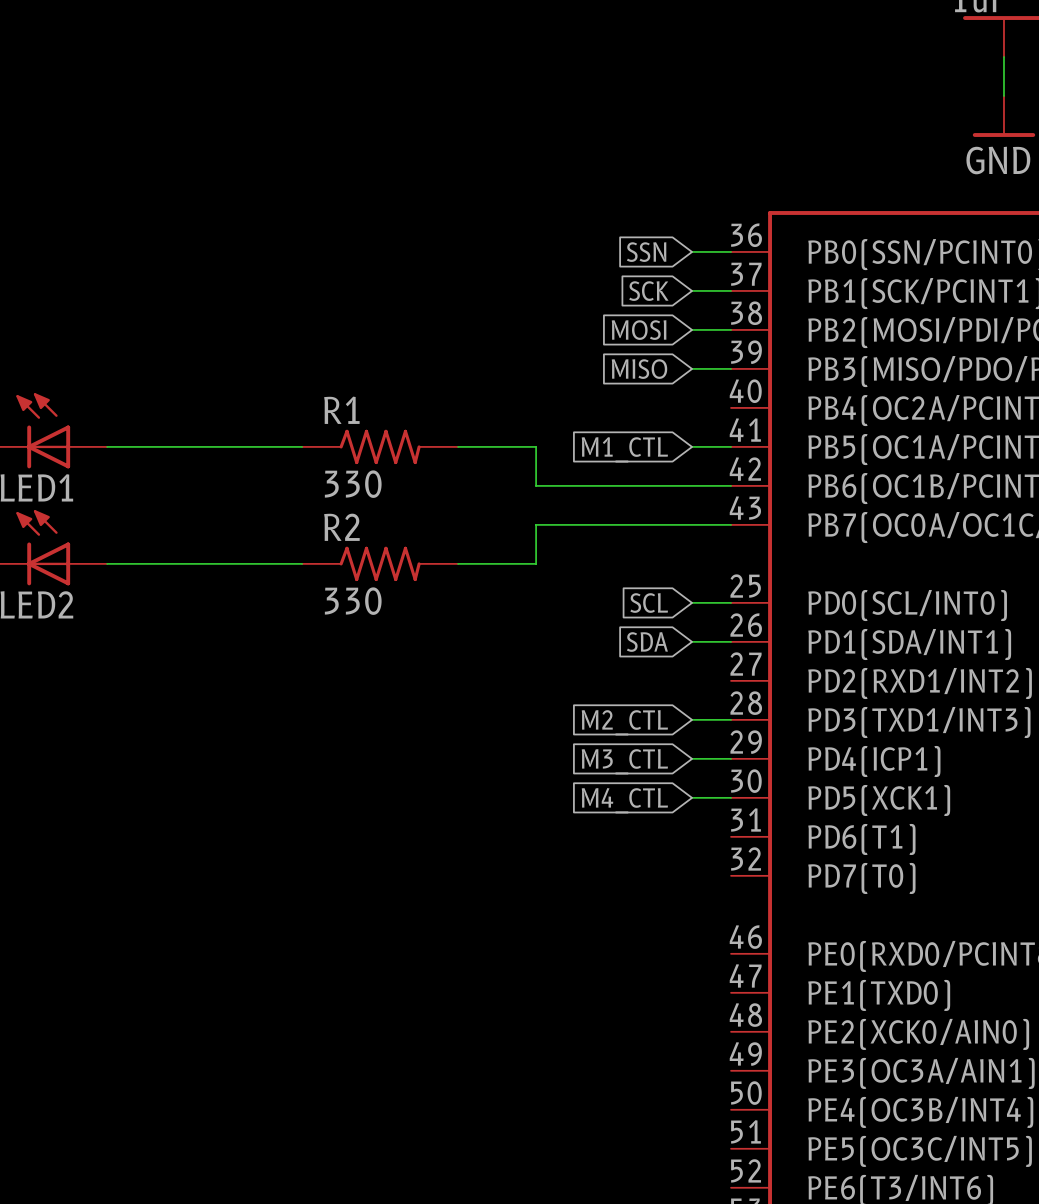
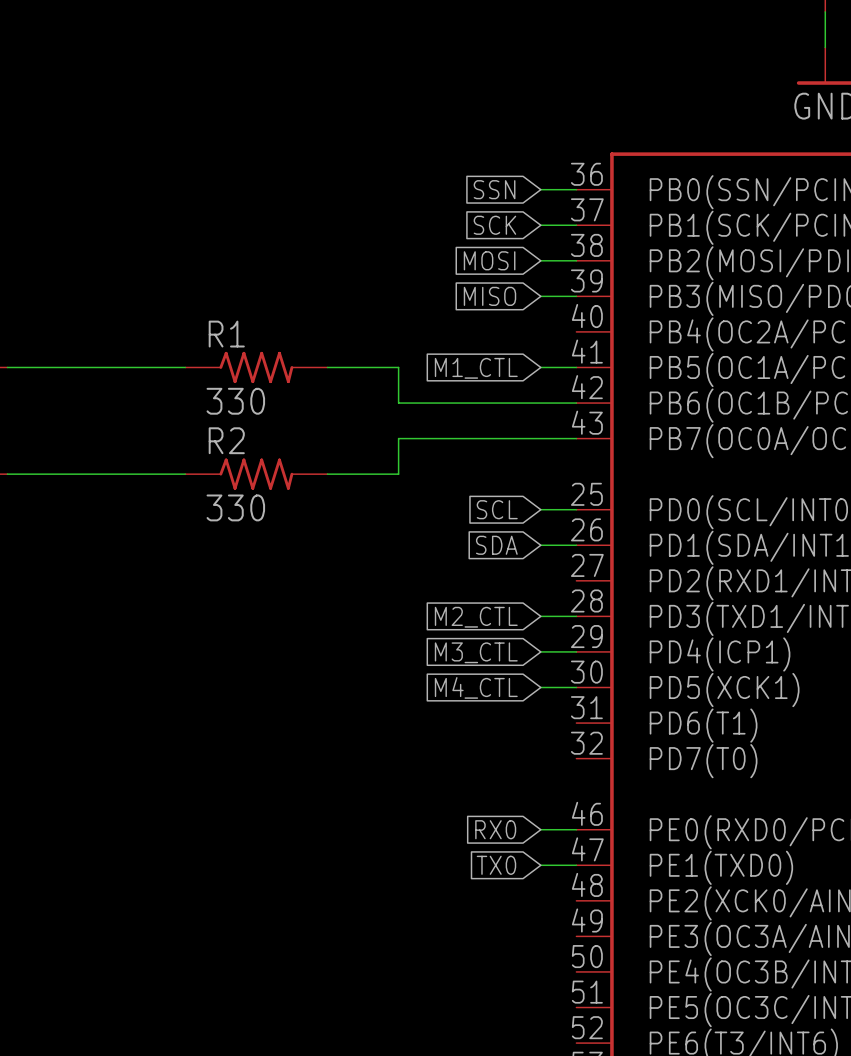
global label: none -> RX0 (495, 829)
wire: none -> (540, 829) (576, 829)
global label: none -> TX0 (496, 865)
wire: none -> (540, 865) (576, 865)

